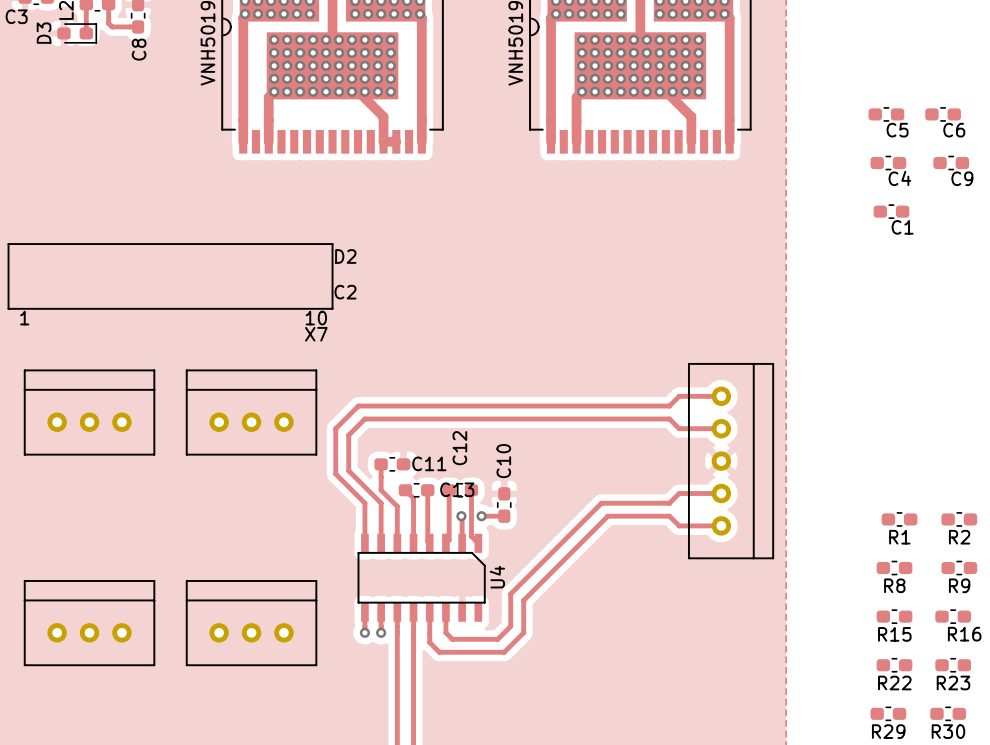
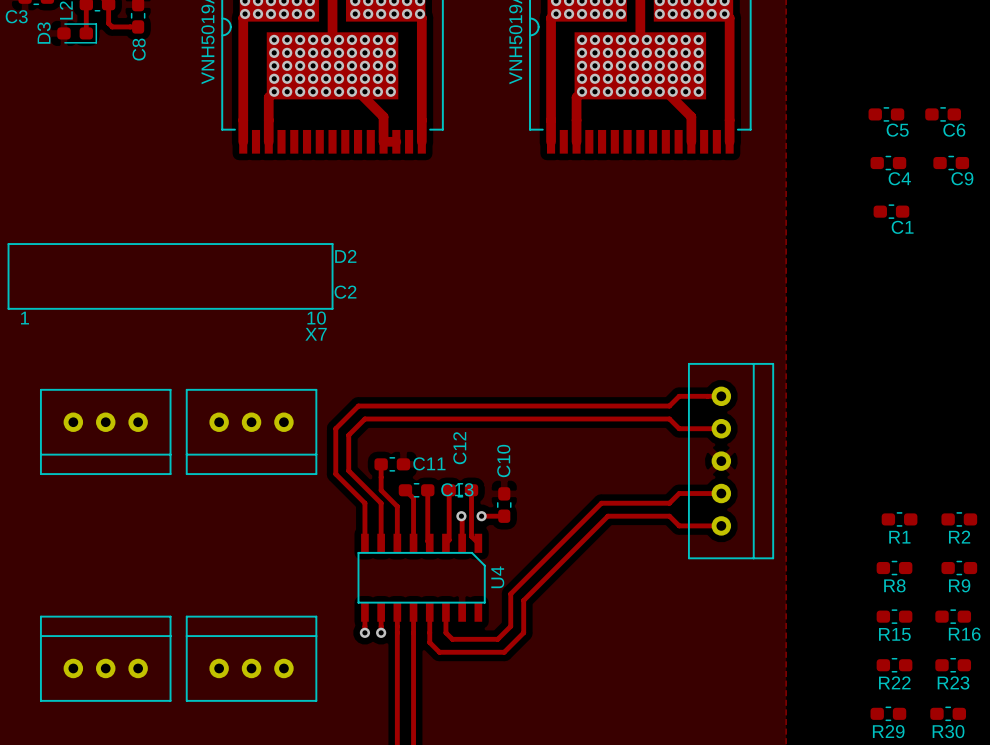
part rotation: 0° (89, 412) -> 180° (105, 431)
part rotation: 0° (251, 412) -> 180° (251, 431)
part position: (89, 623) -> (105, 658)
part position: (251, 623) -> (251, 658)

